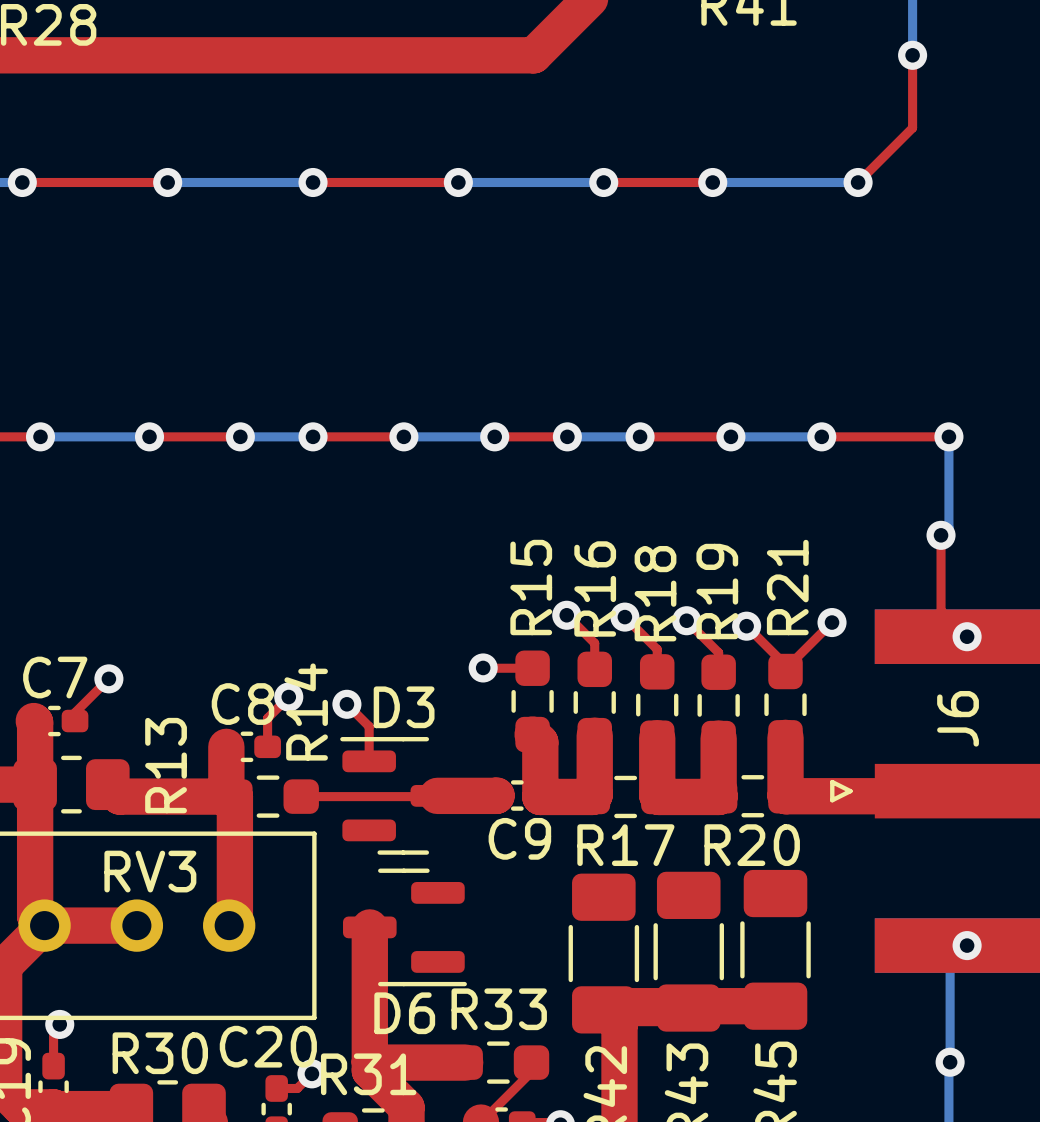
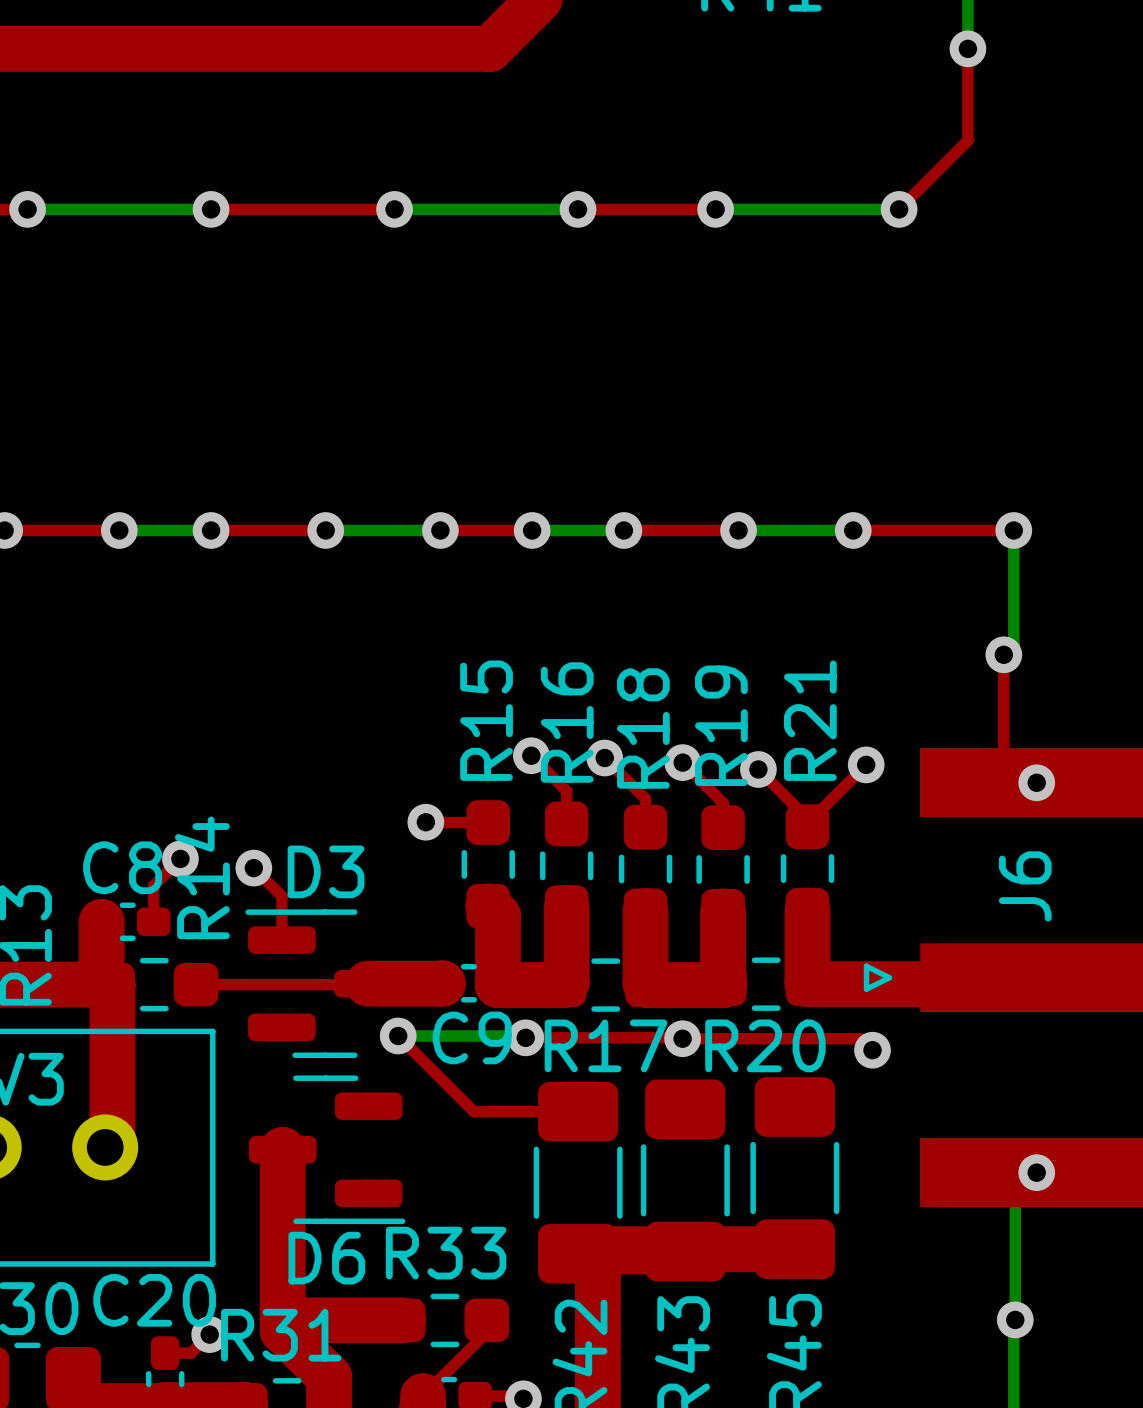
top track: none -> (398, 1035) (473, 1111) (578, 1111)
bottom track: none -> (398, 1035) (523, 1035) (525, 1037)
via: none -> (398, 1035)
top track: none -> (525, 1037) (861, 1038) (872, 1050)
via: none -> (525, 1037)
via: none -> (682, 1038)
via: none -> (872, 1050)

